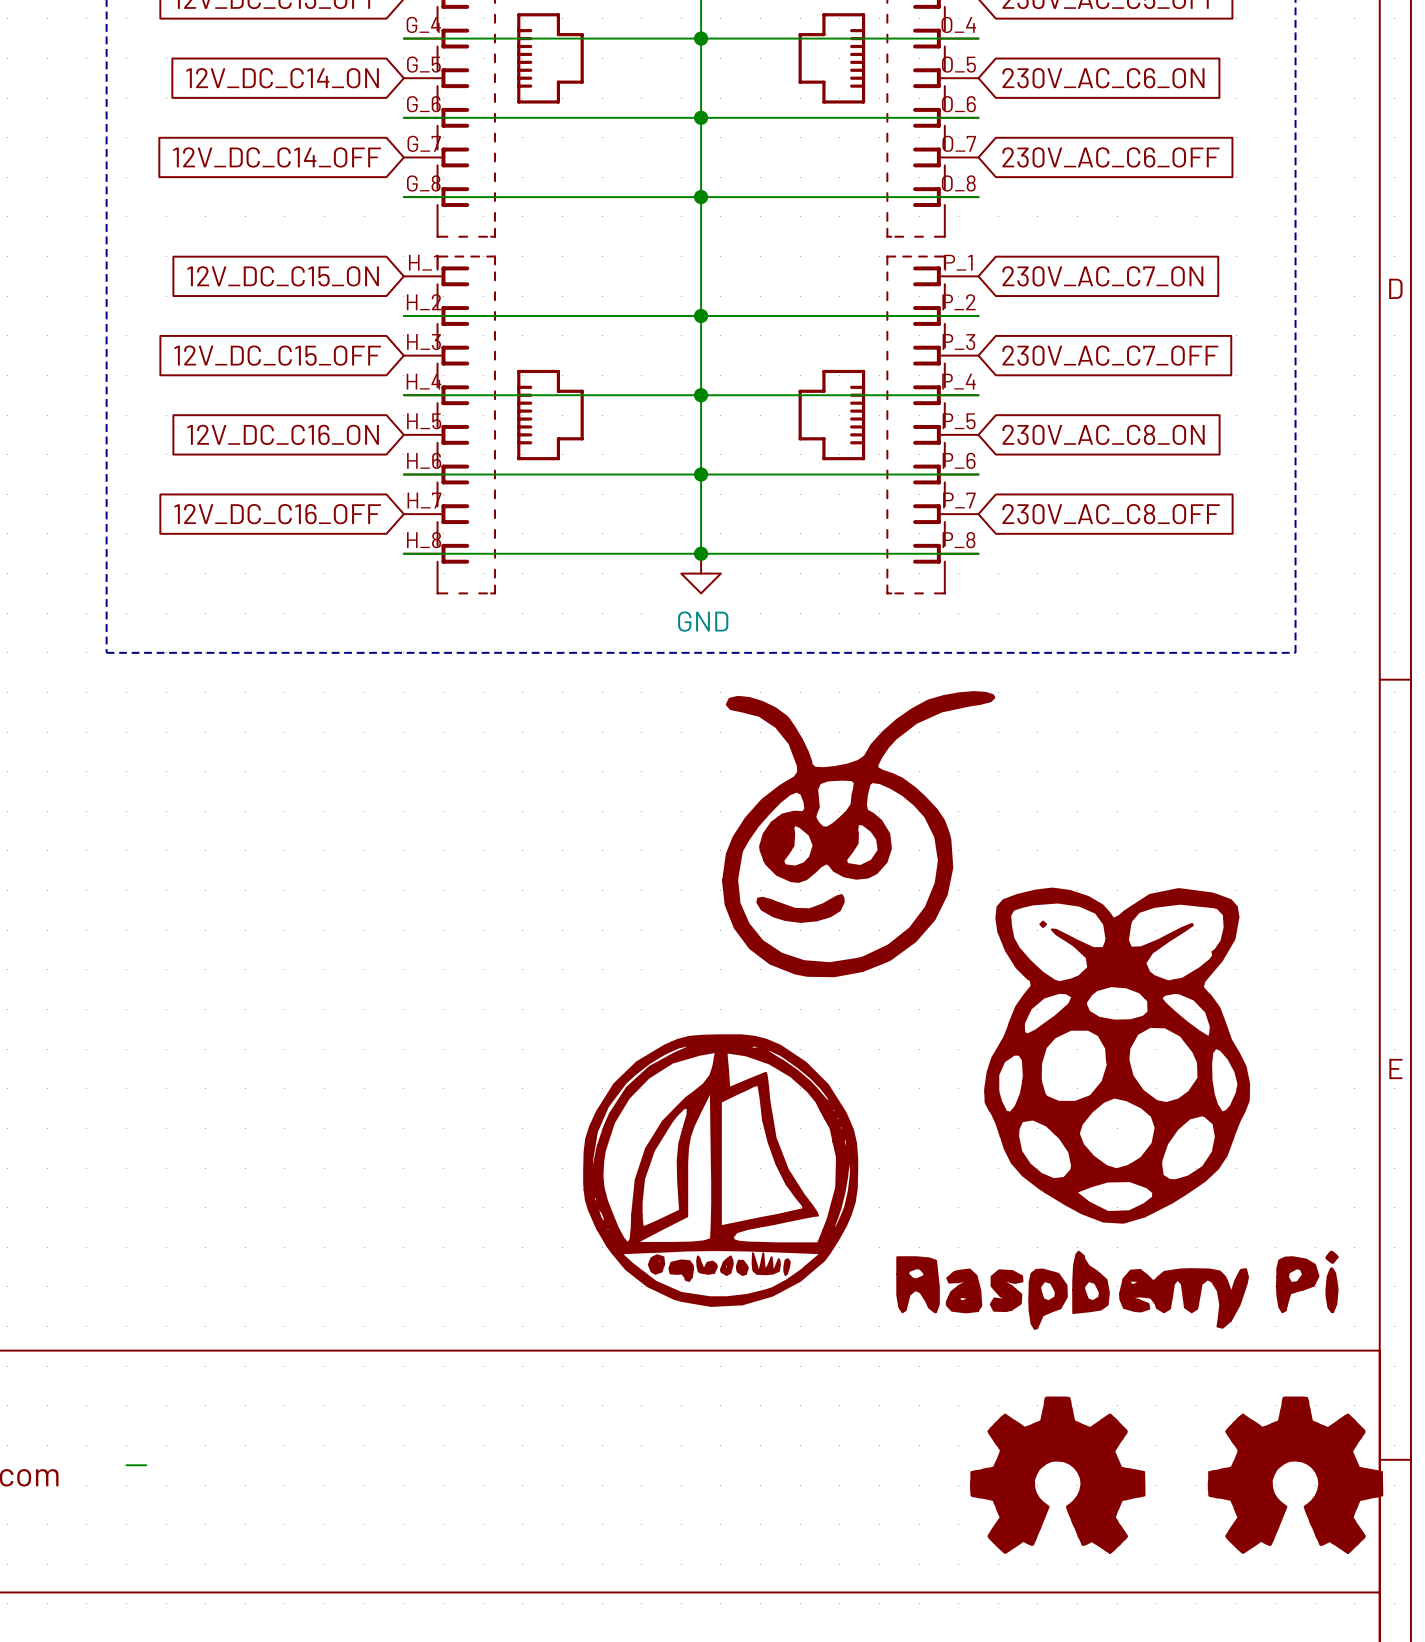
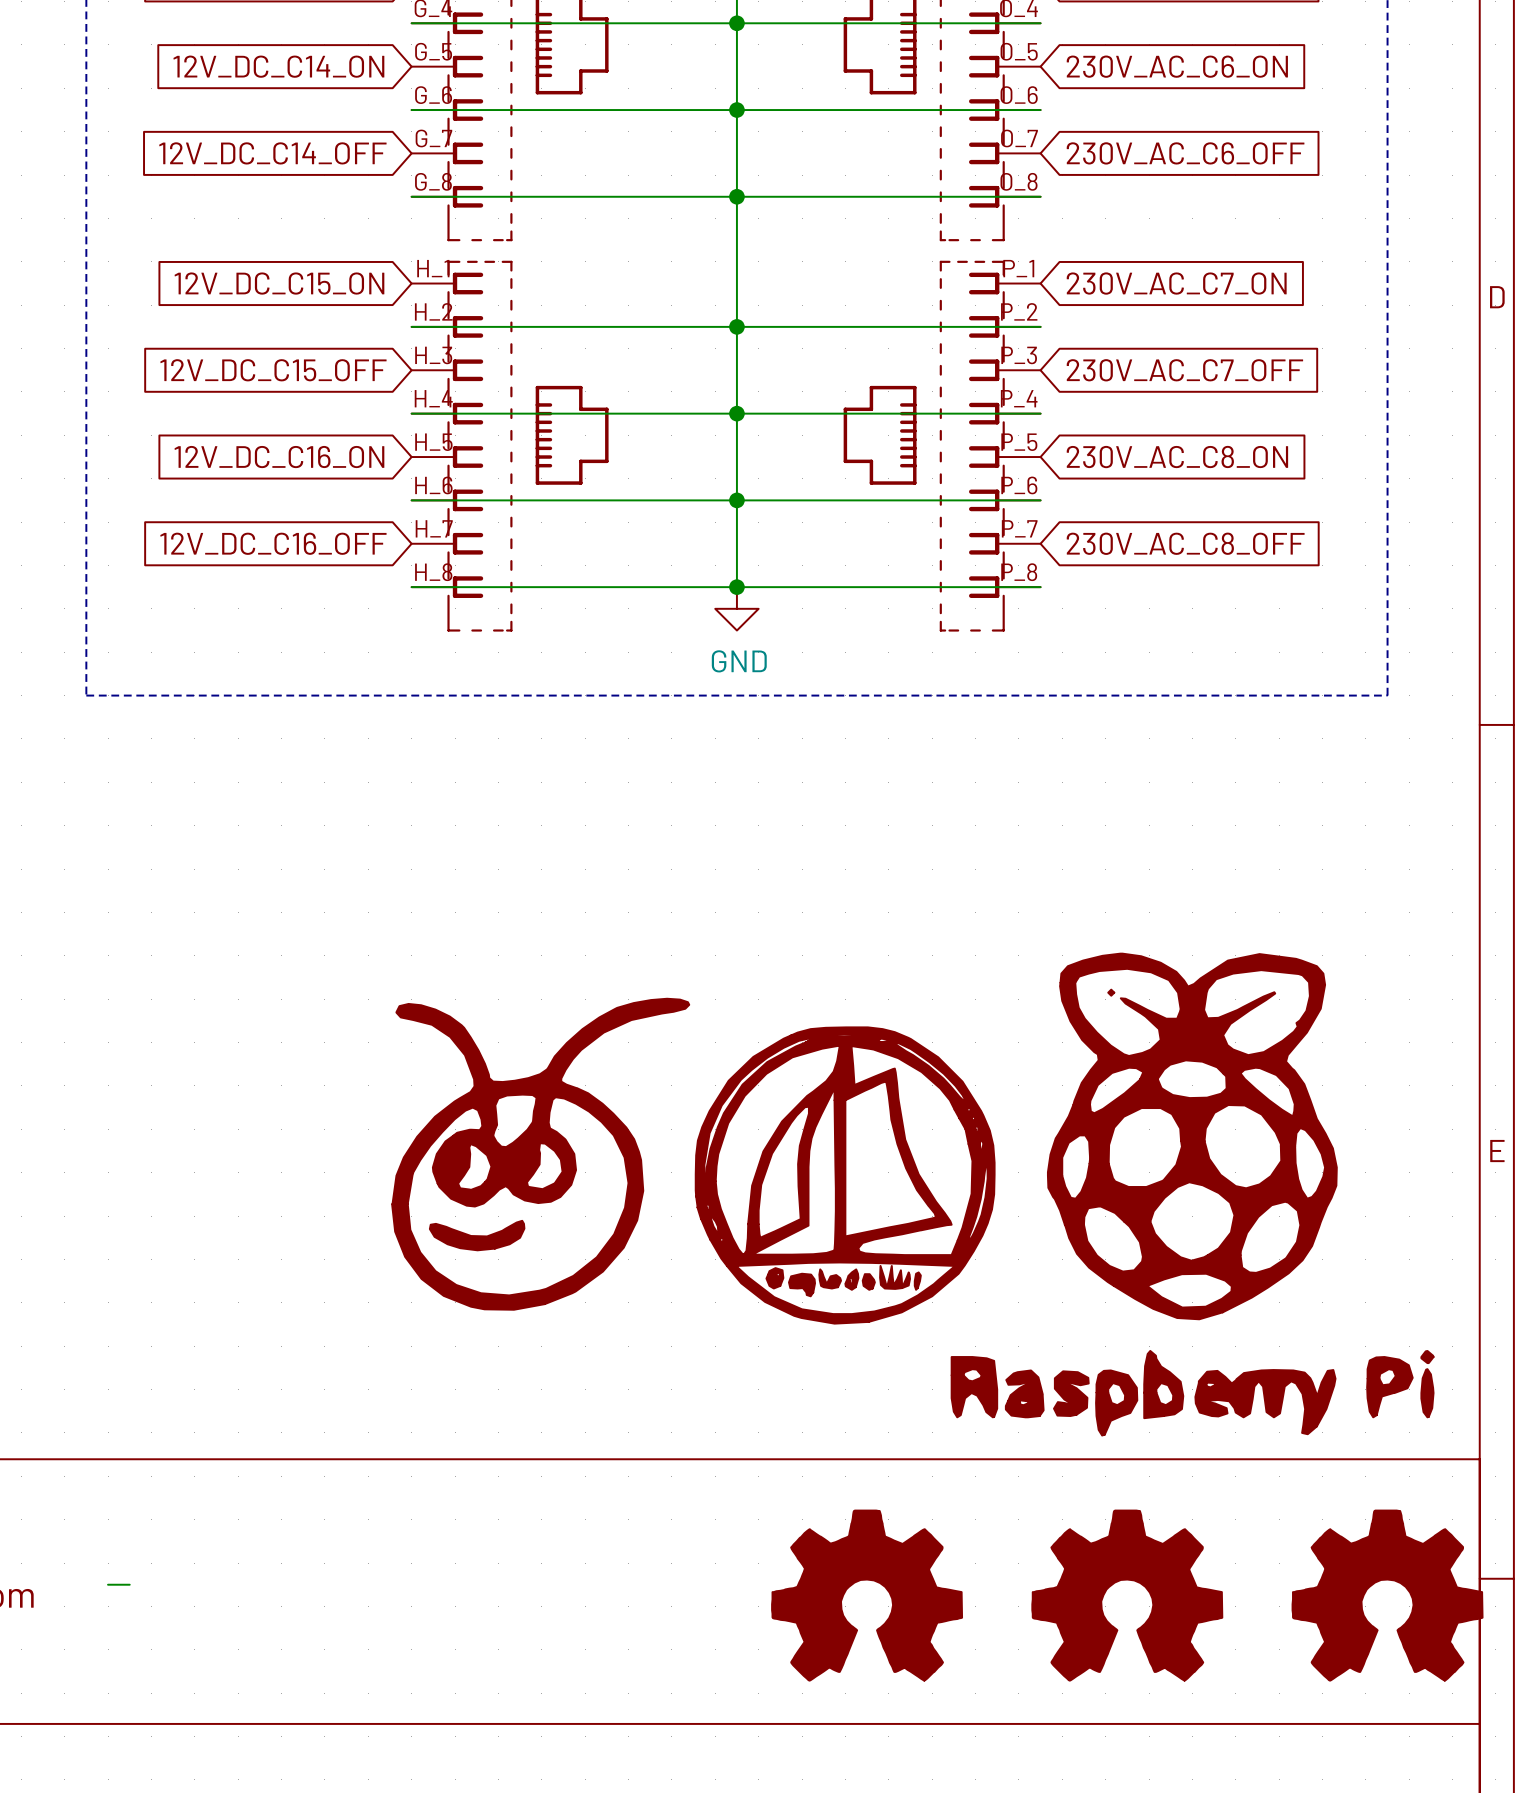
part: (858, 834) -> none
part: none -> (540, 1154)
part position: (720, 1170) -> (845, 1175)
part: none -> (867, 1595)

